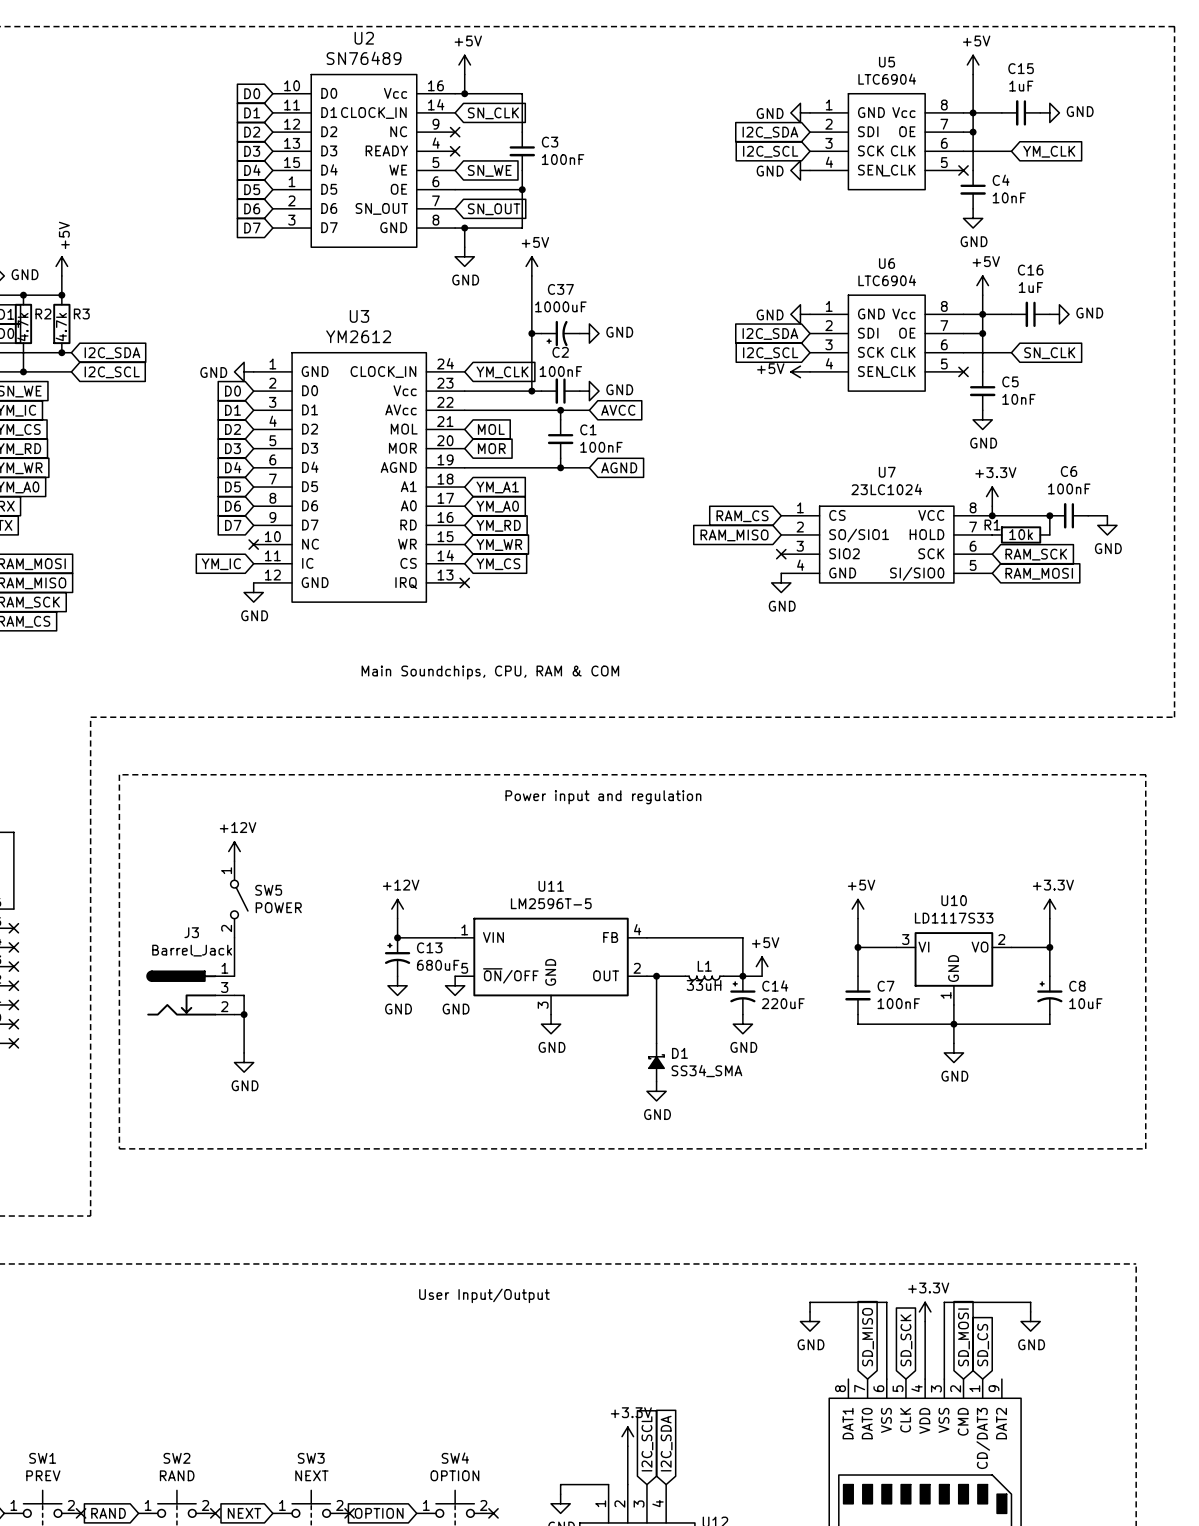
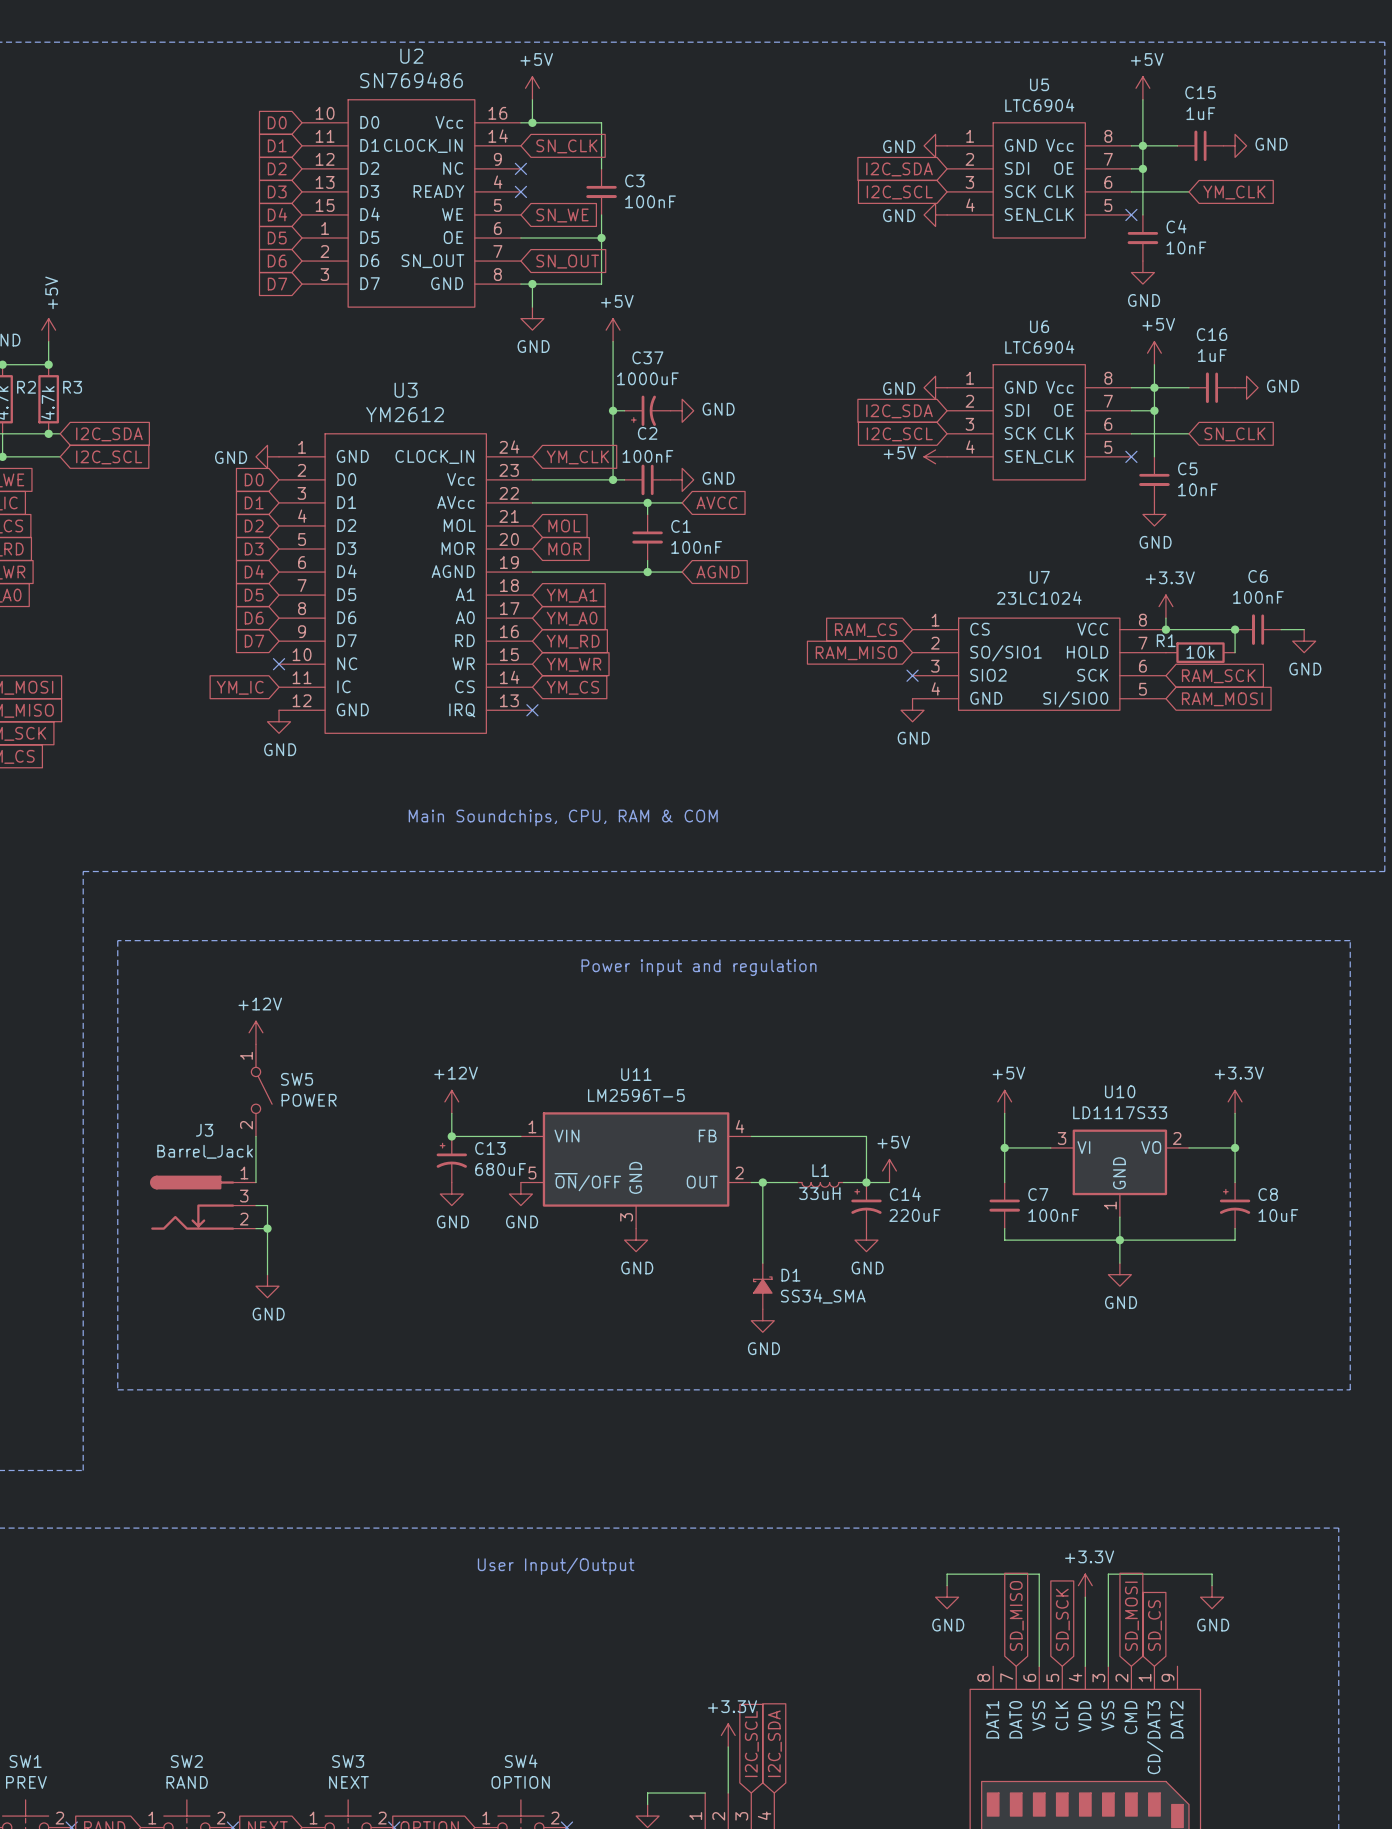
U2 value: SN76489 (364, 58) -> SN769486 (411, 80)

